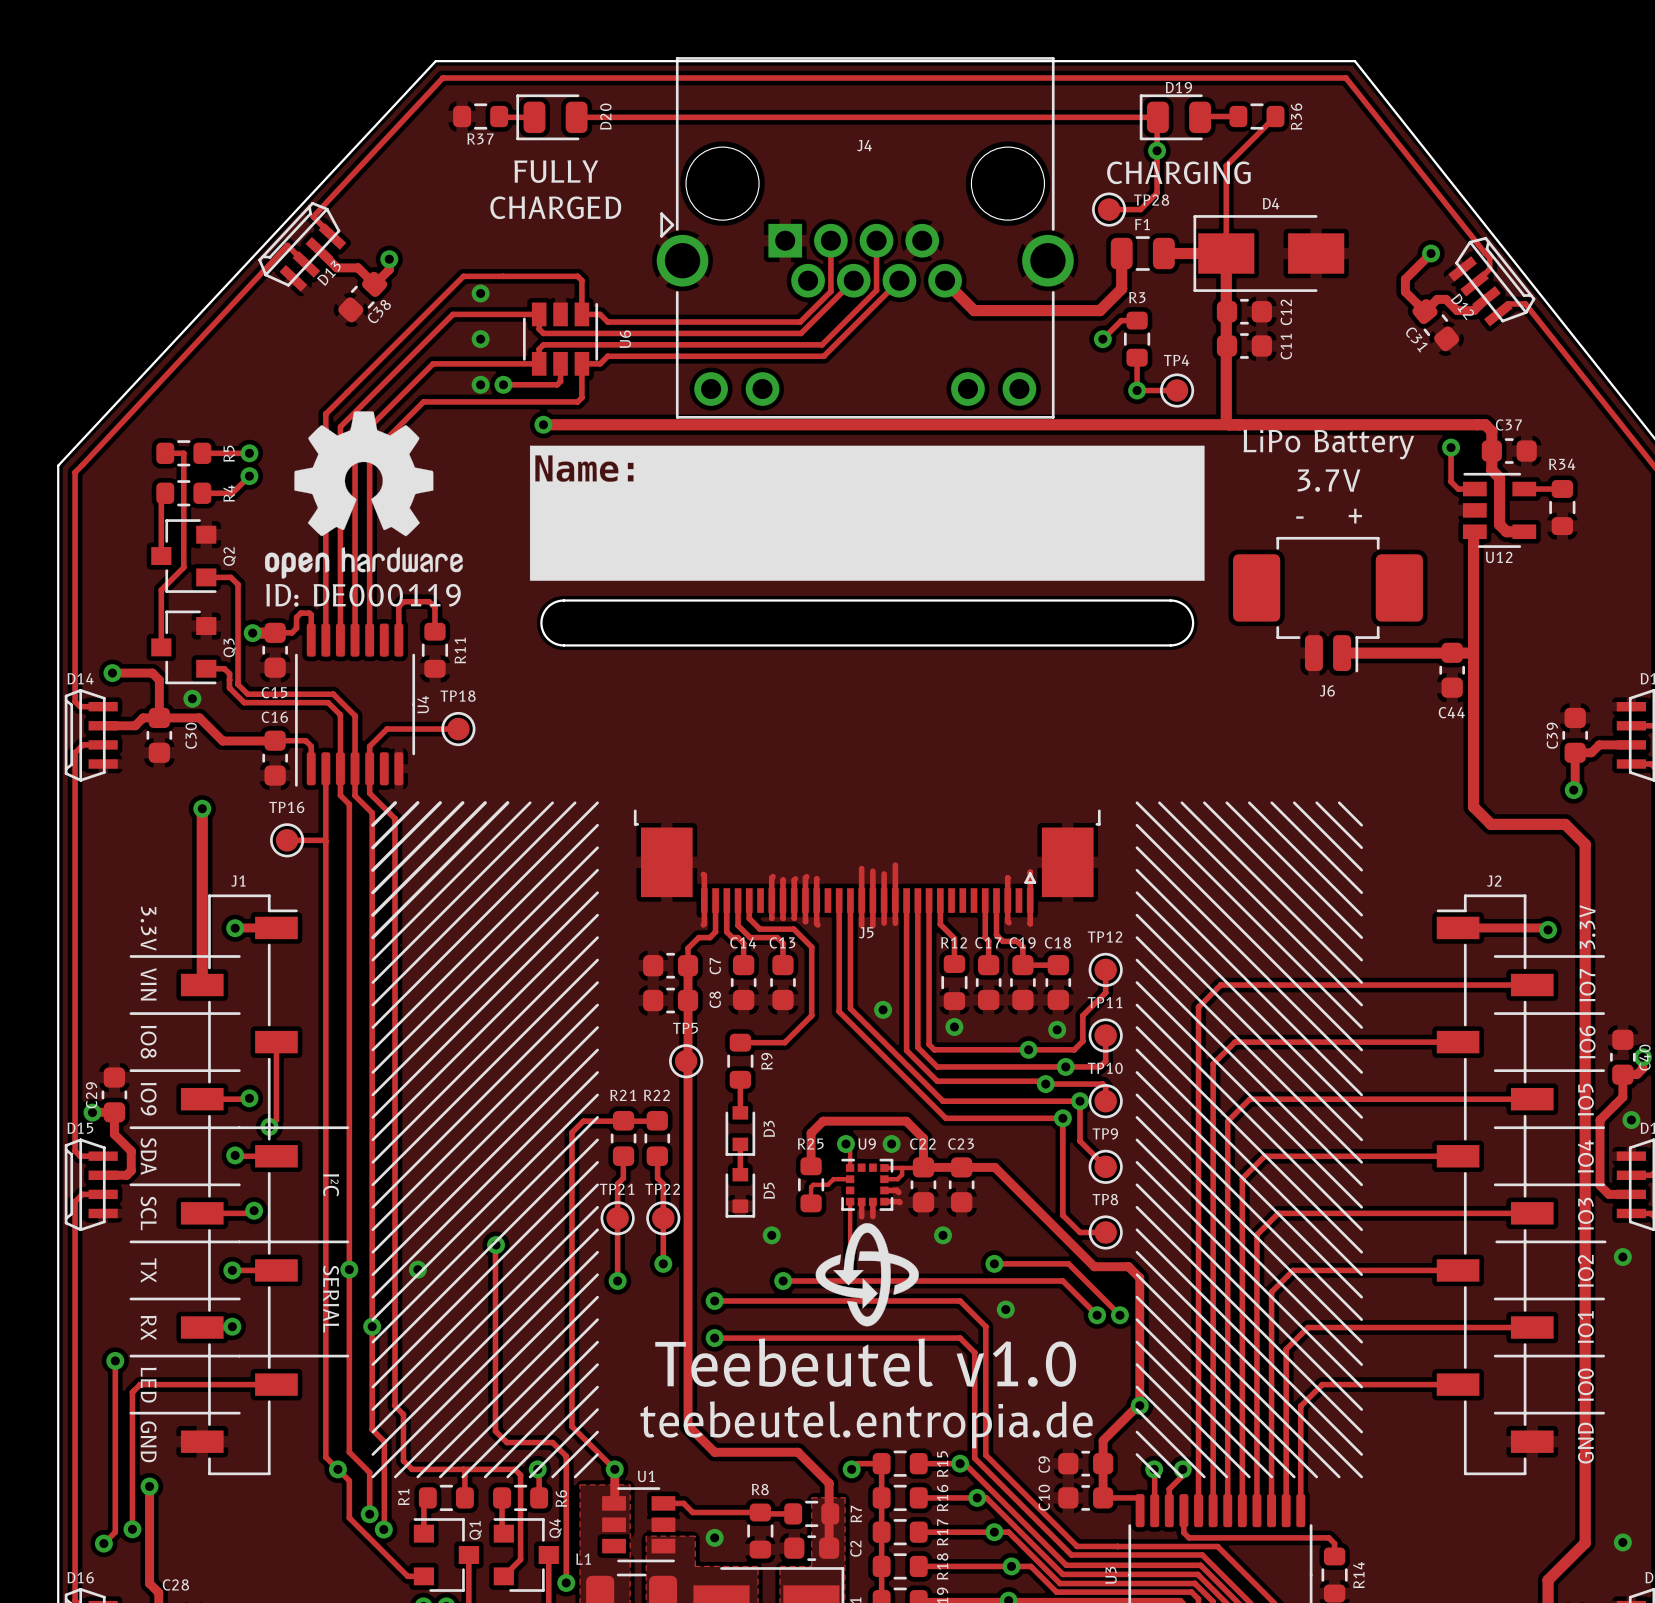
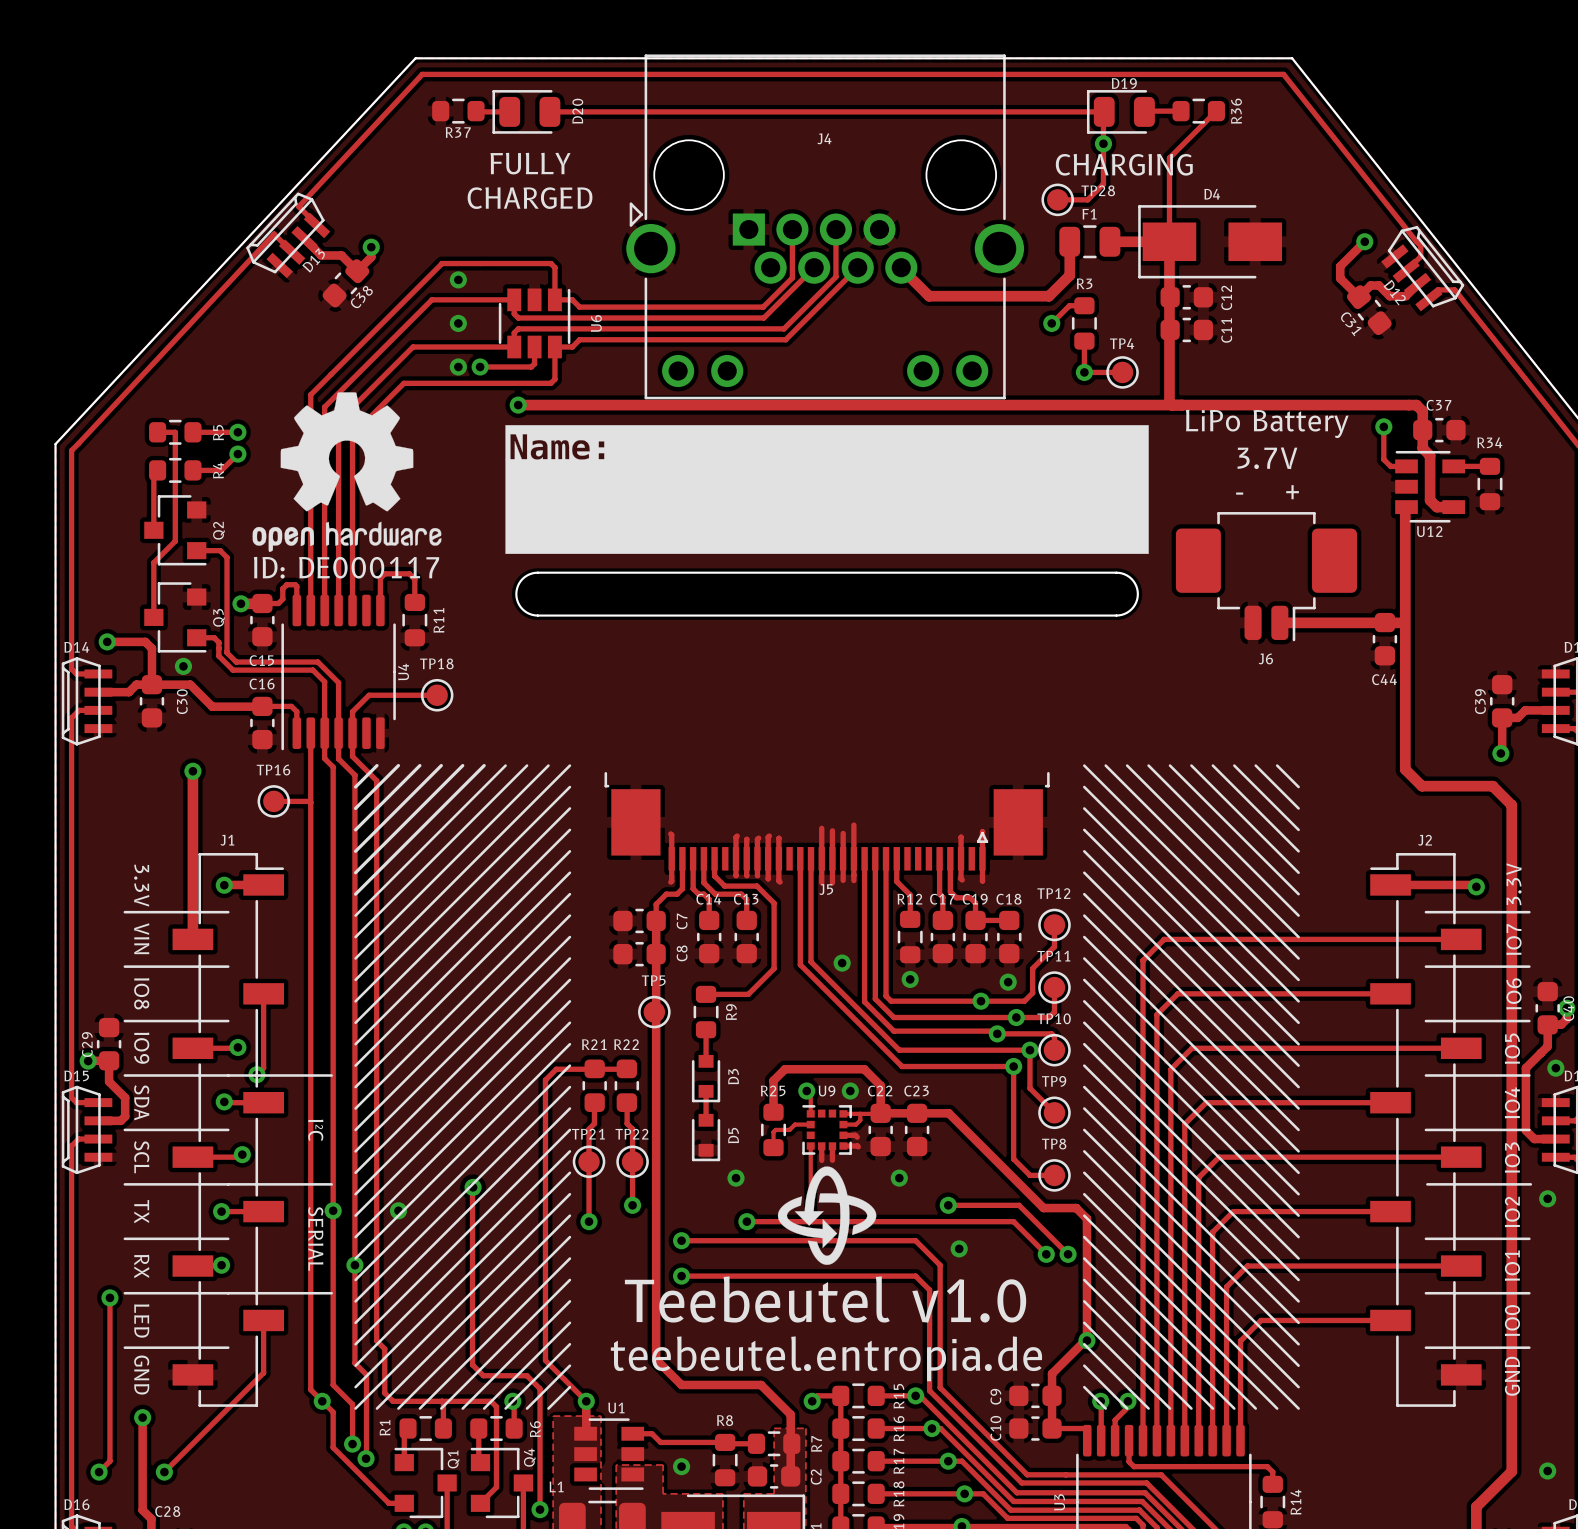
text: ID: DE000119 (363, 595) -> ID: DE000117 (346, 567)
track: (276, 1384) (140, 1384) (132, 1392) (132, 1529) -> (263, 1320) (263, 1372) (164, 1472)
via position: (132, 1529) -> (164, 1472)

